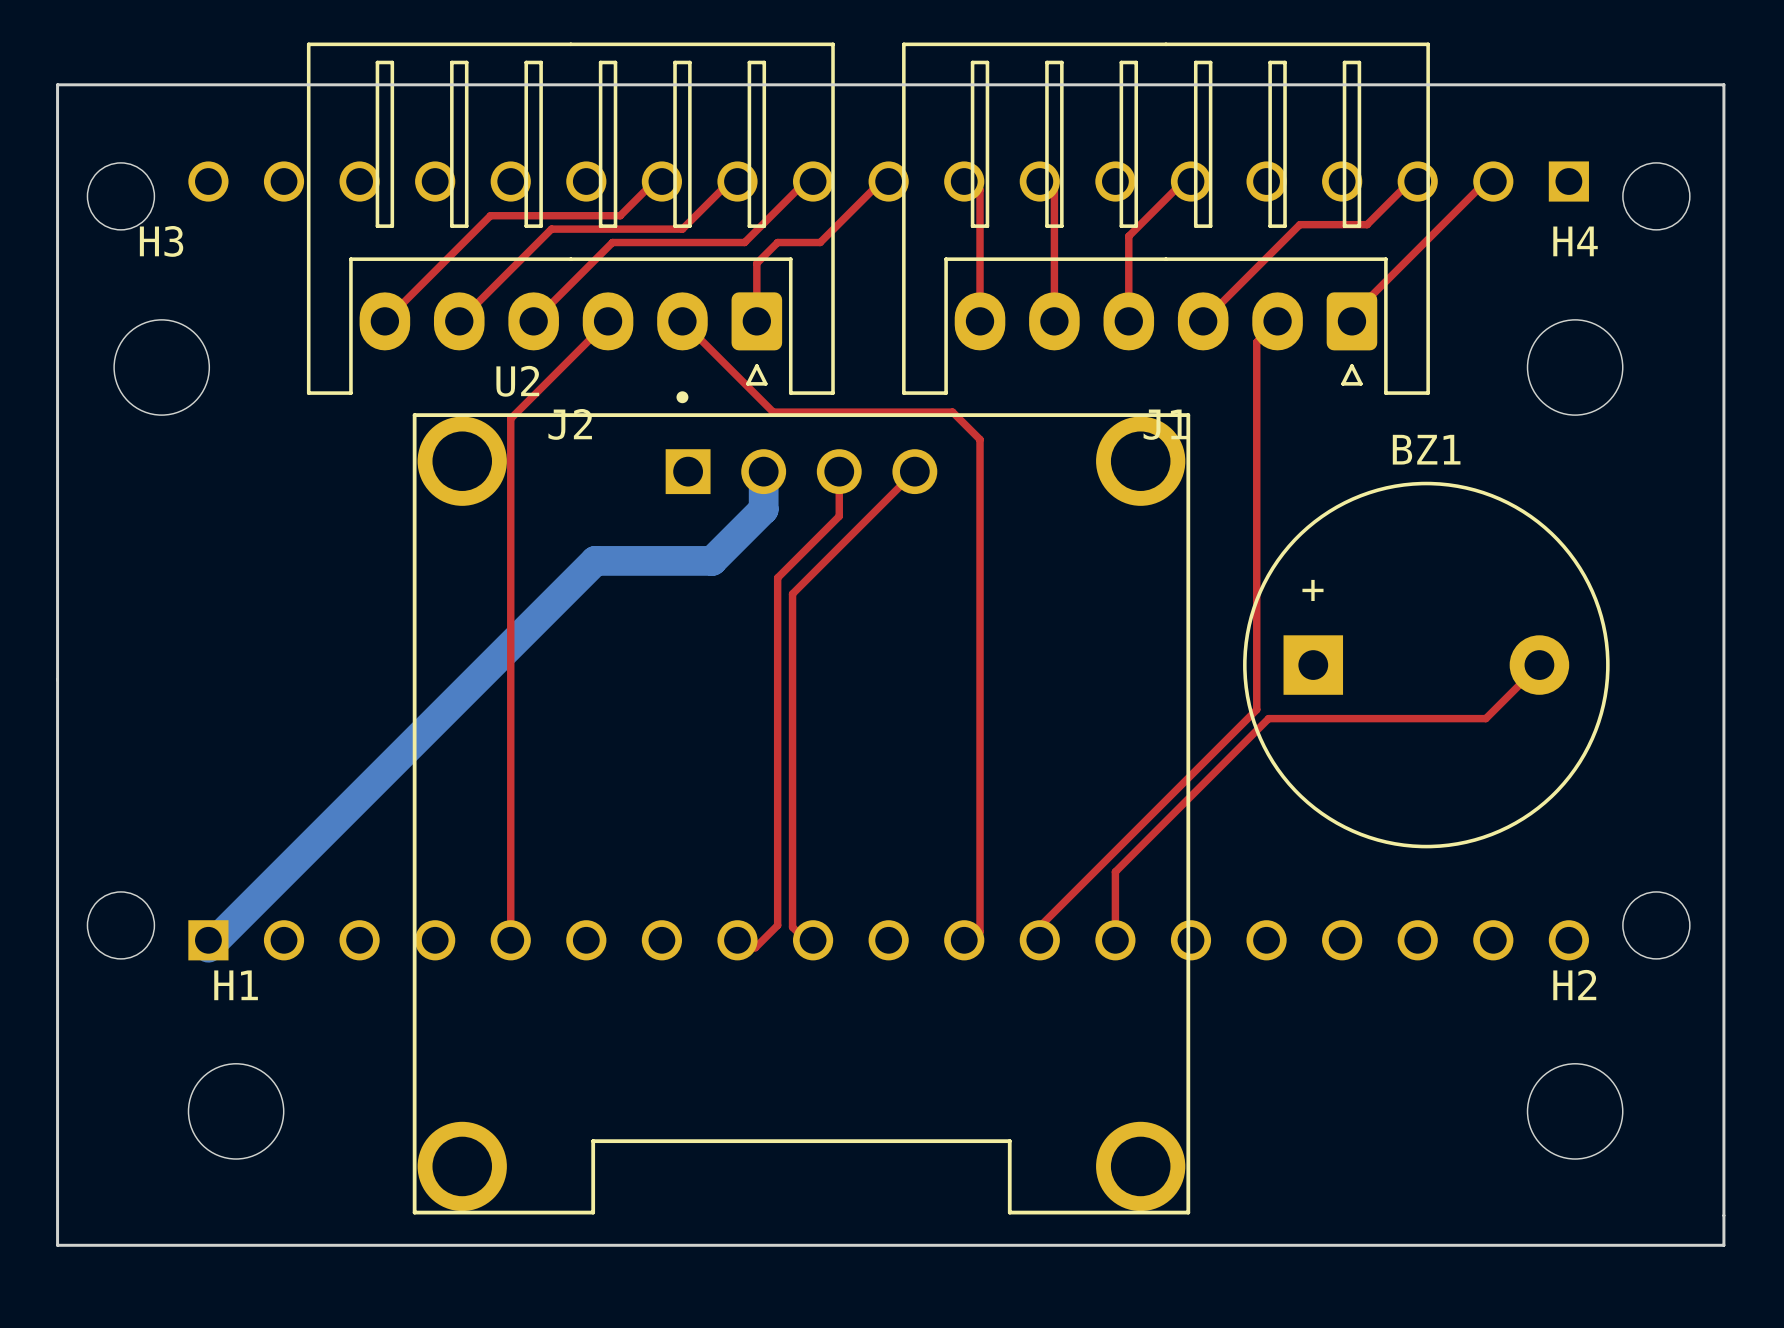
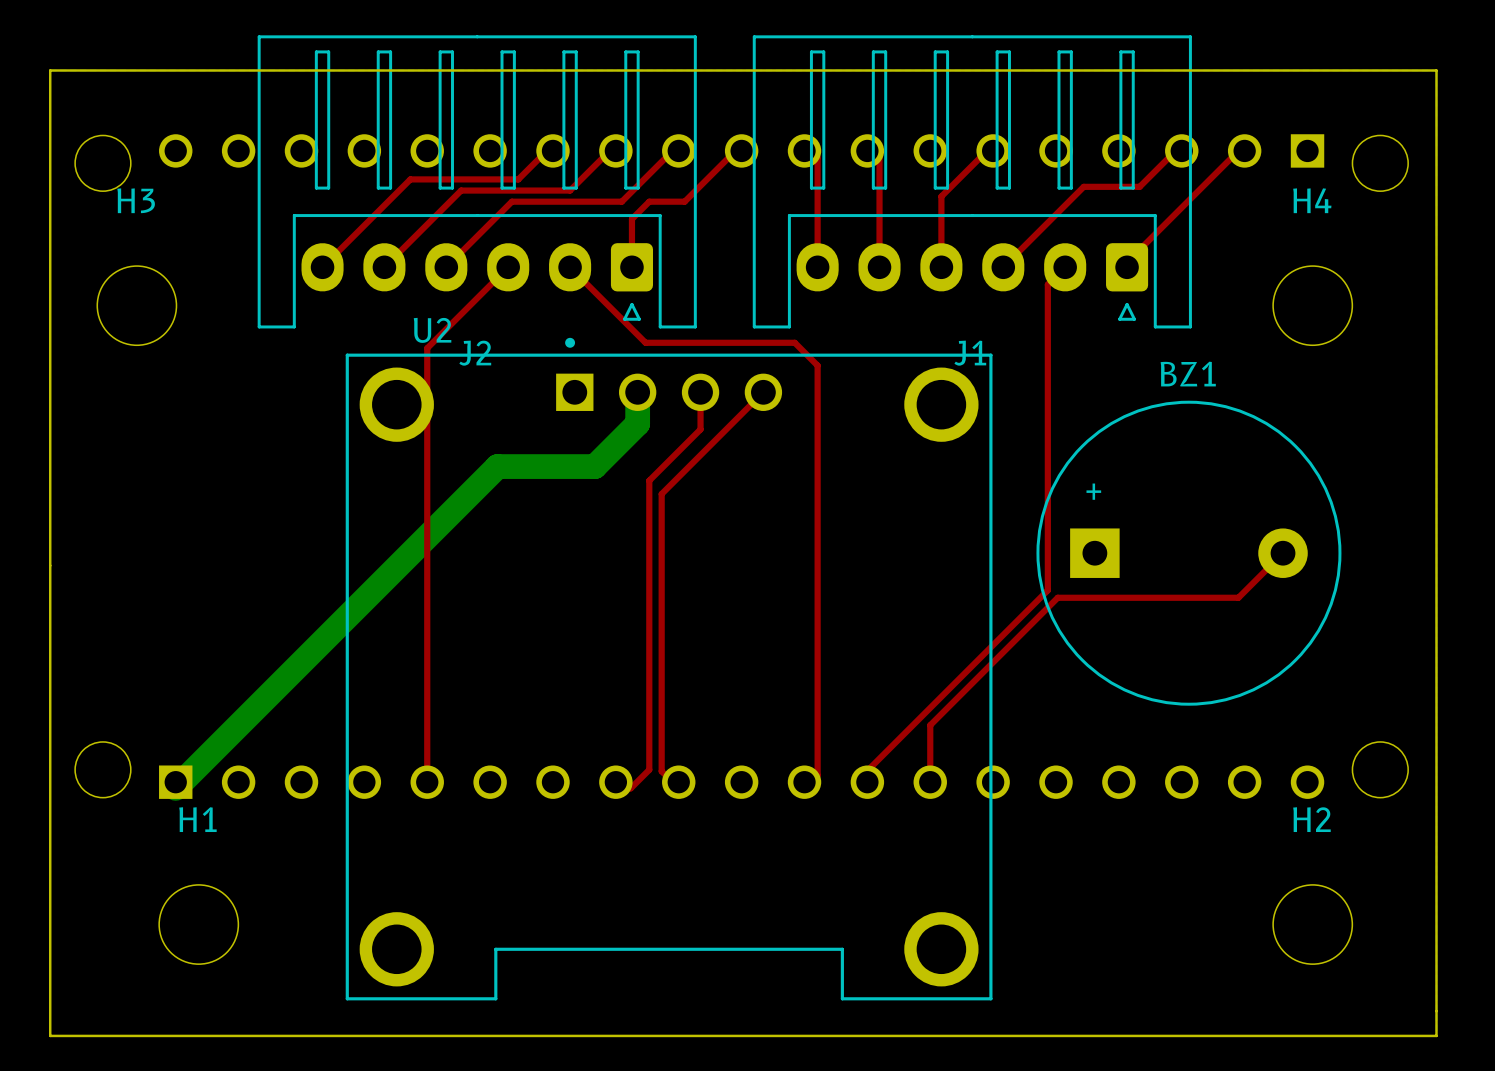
U2 name position: U2 (517, 381) -> U2 (432, 330)
U2 footprint: [412, 391, 1191, 1215] -> [345, 337, 993, 1001]

